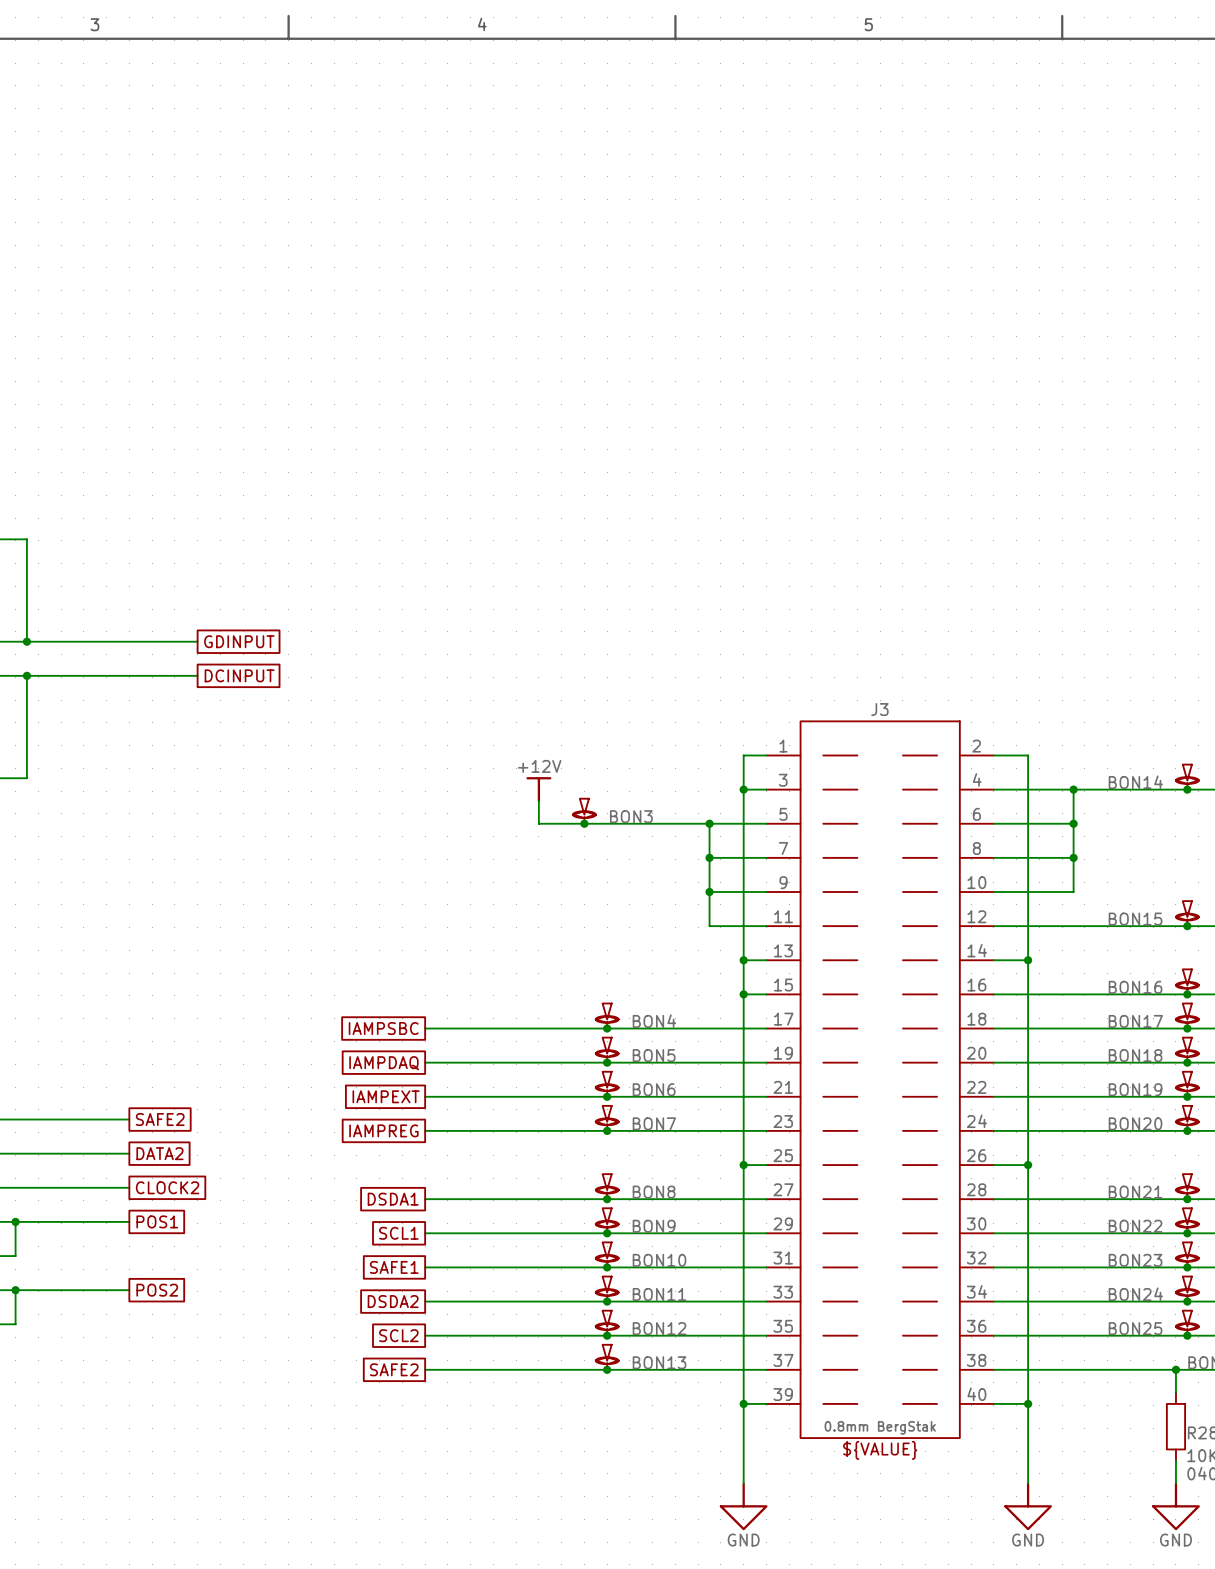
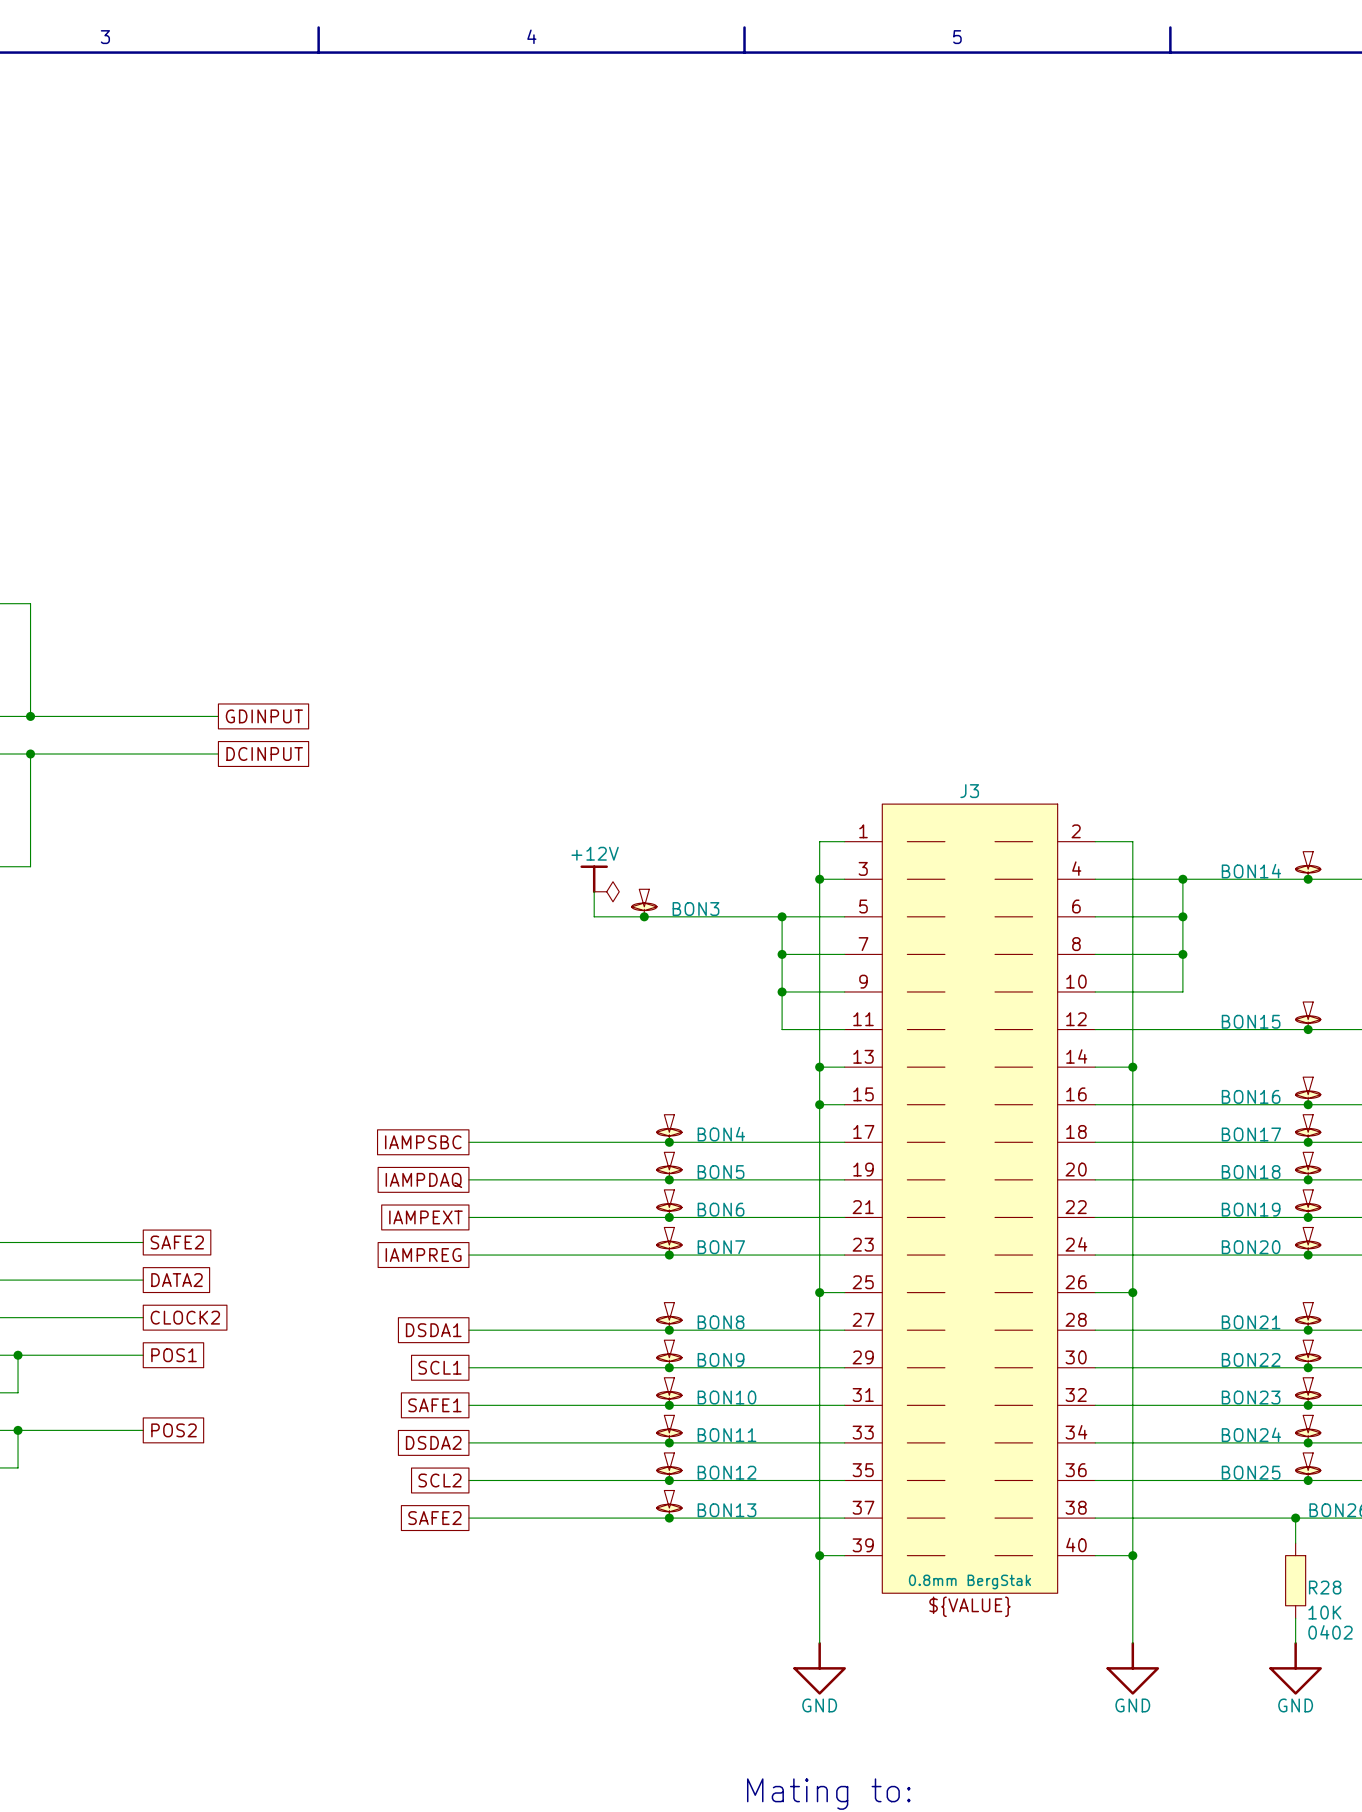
power symbol: none -> (606, 891)

